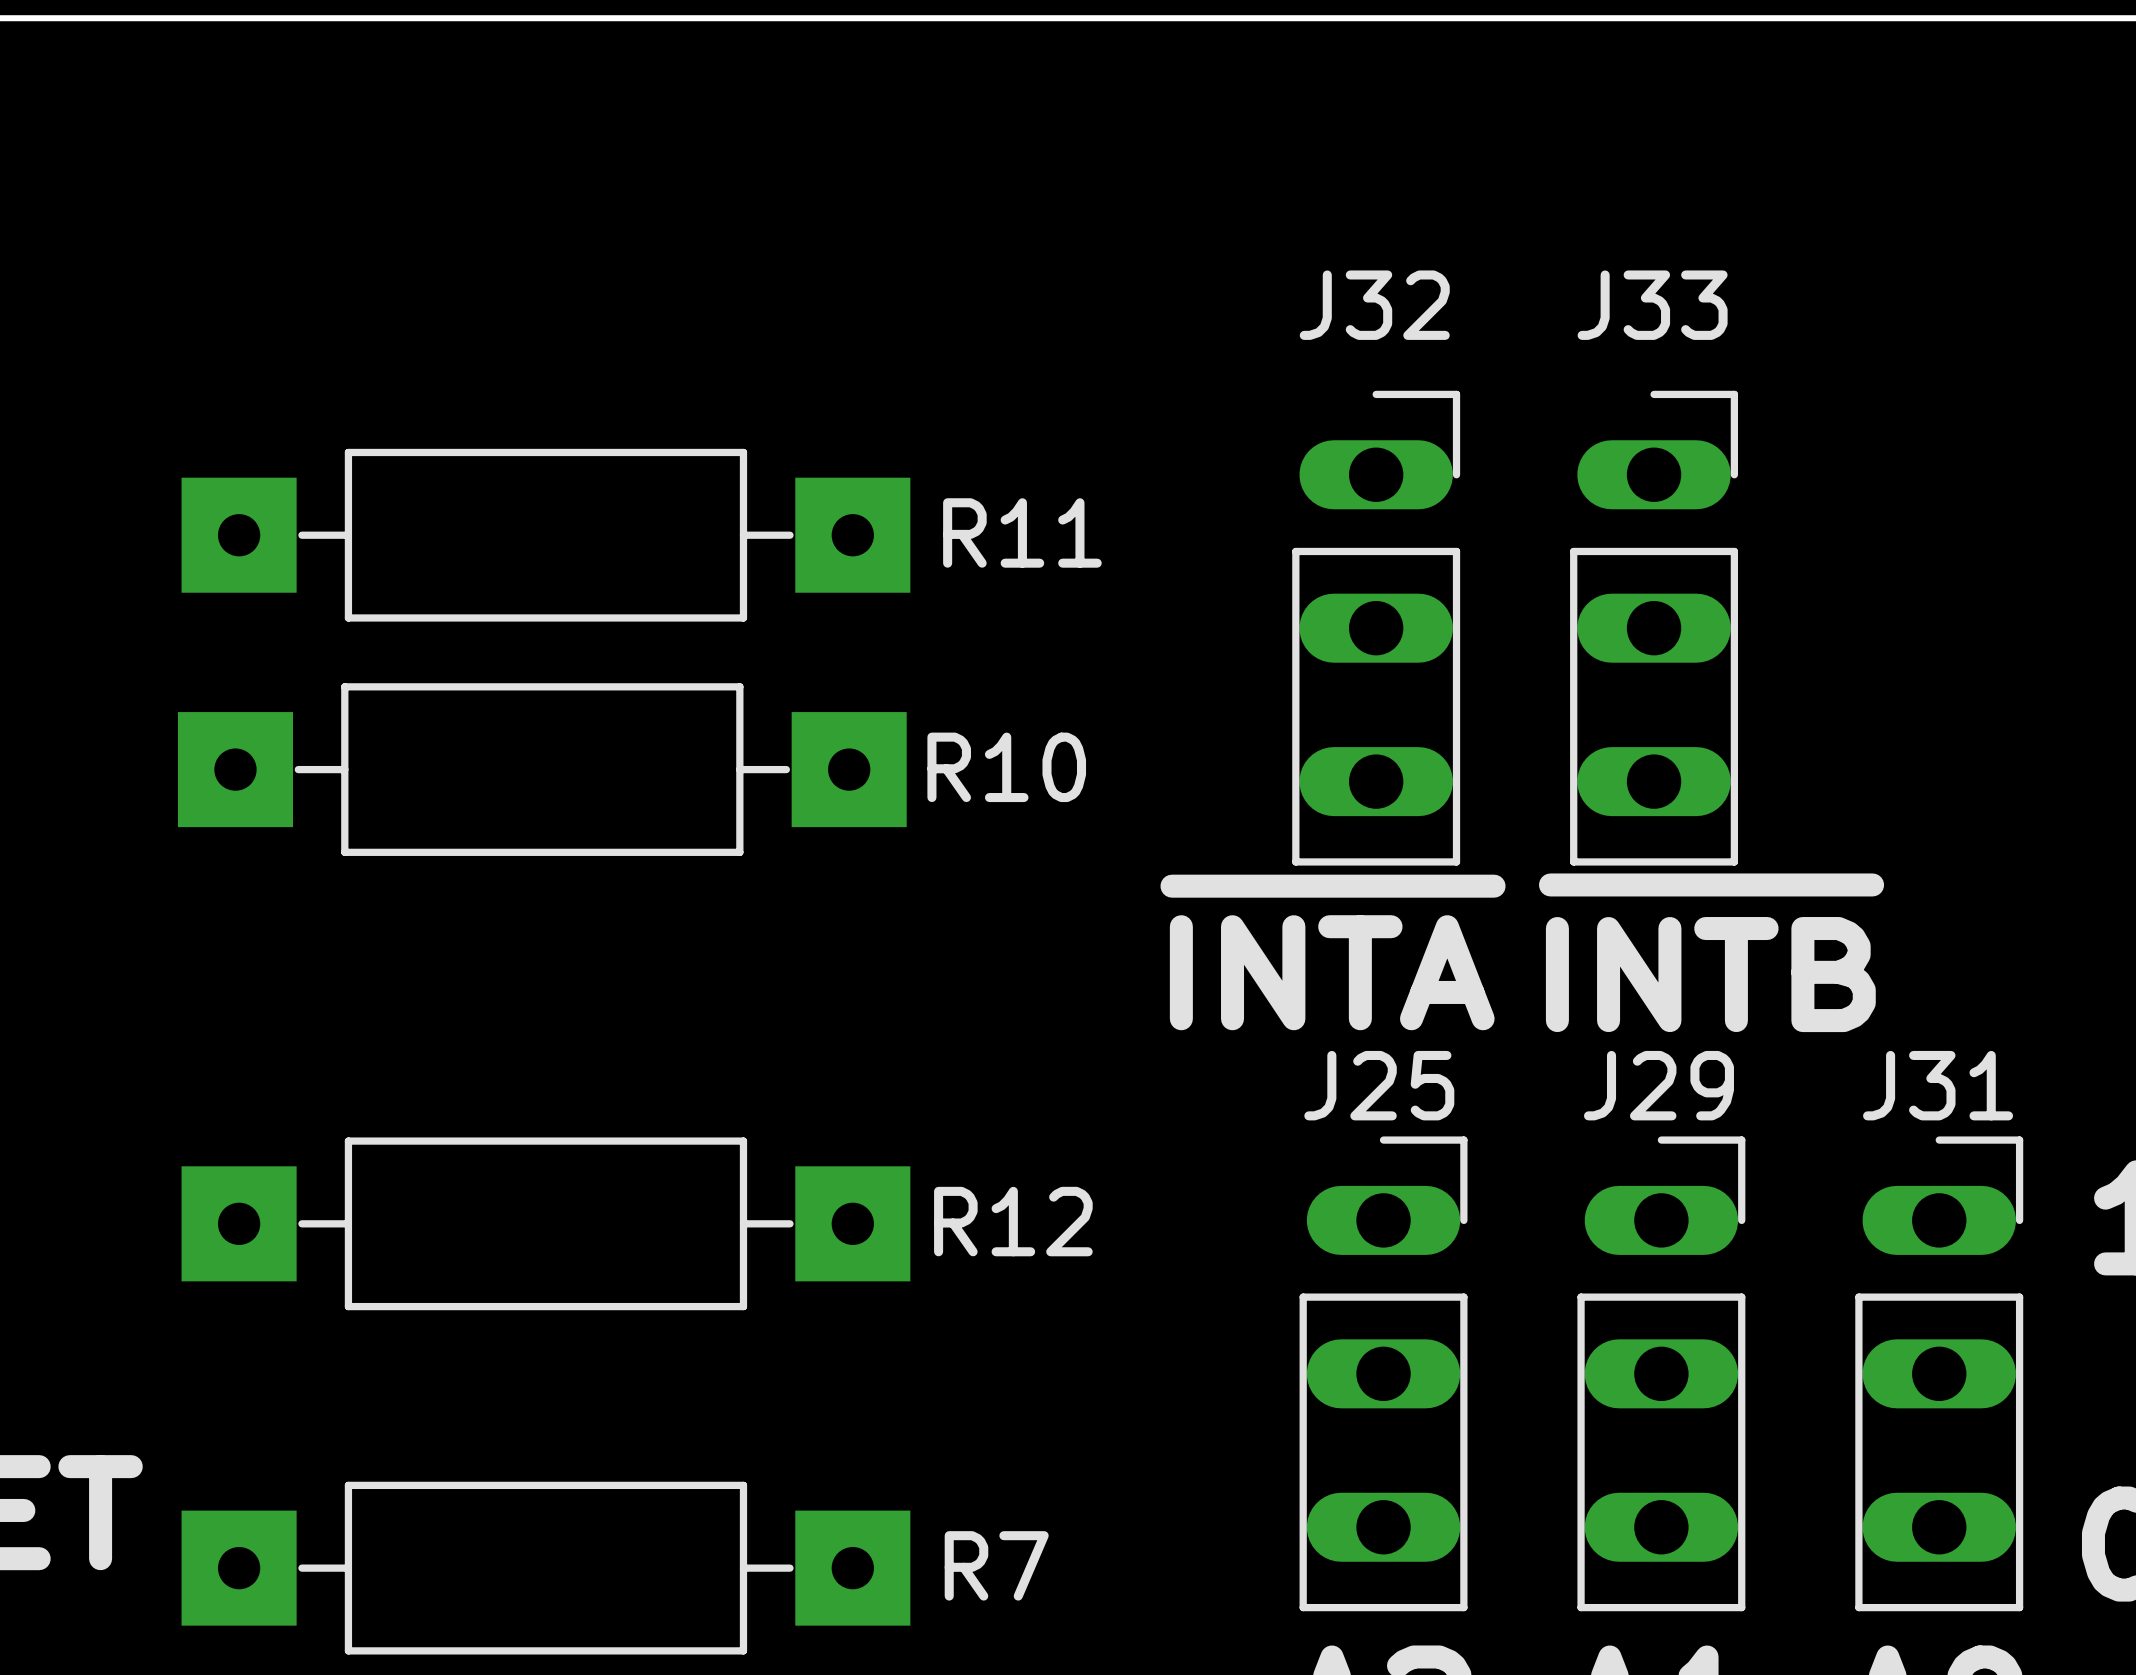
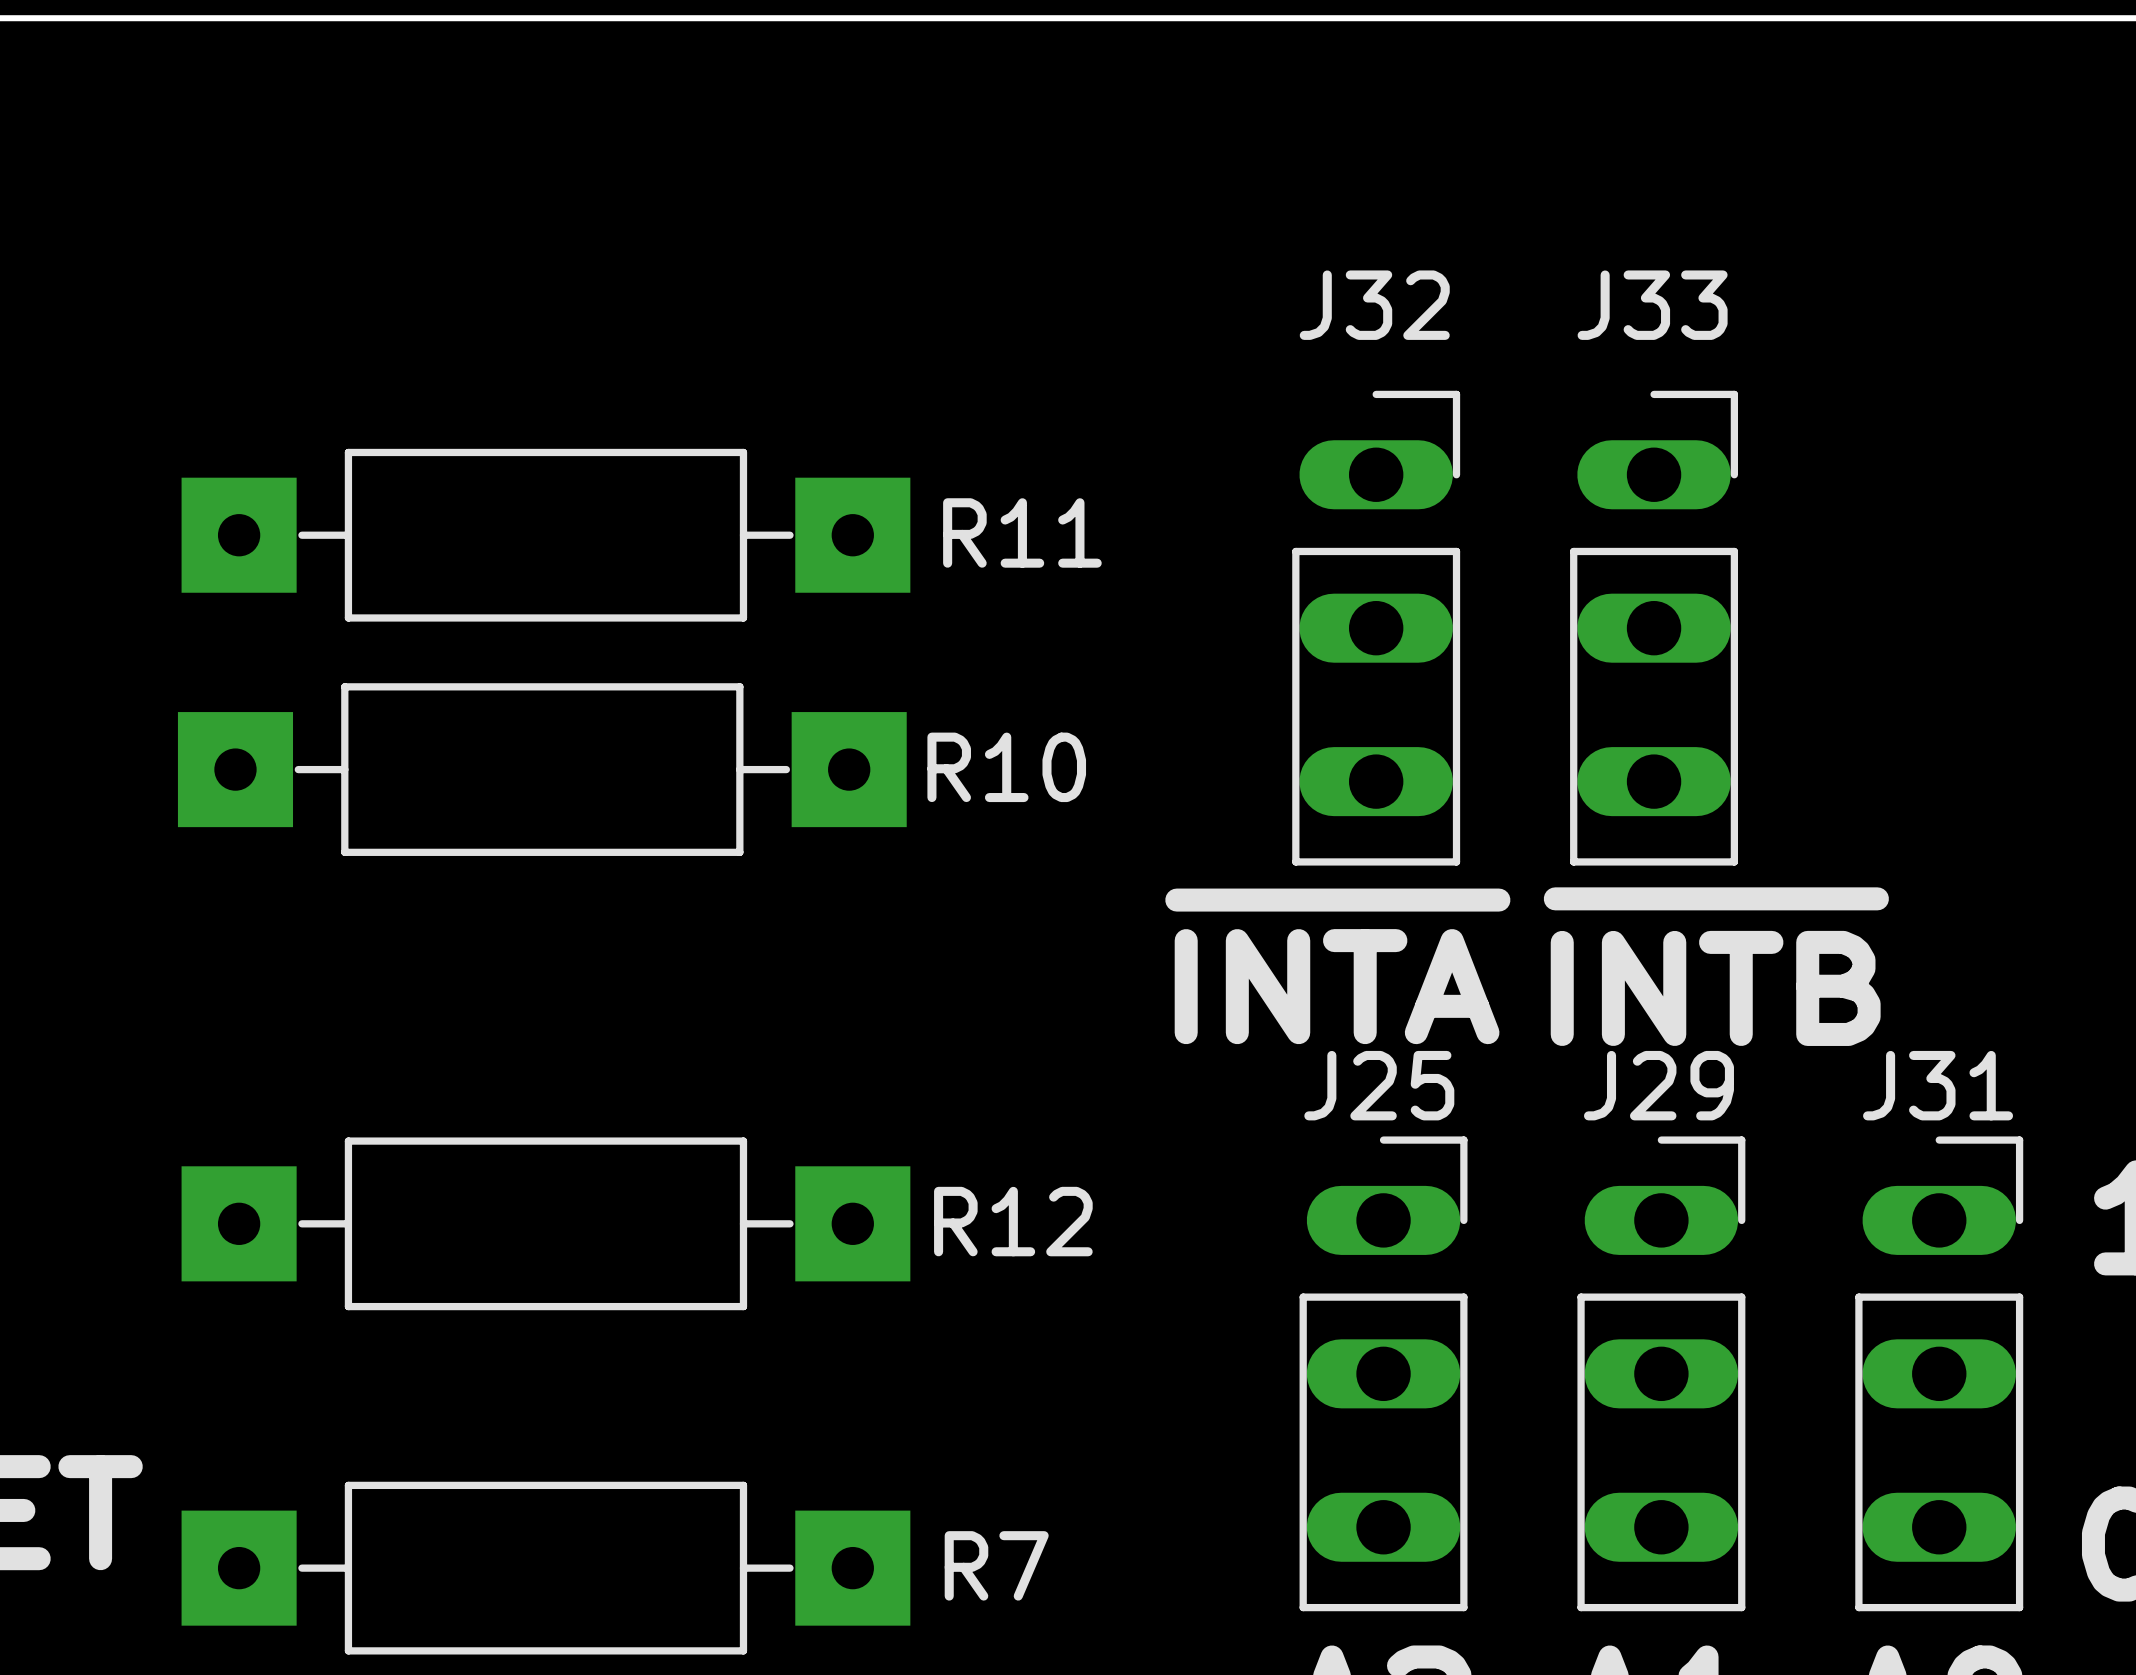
line: (1550, 884) (1872, 884) -> (1555, 898) (1877, 898)
line: (1171, 886) (1494, 886) -> (1176, 900) (1498, 900)
J32 value position: INTA (1332, 972) -> INTA (1337, 986)
J33 value position: INTB (1710, 974) -> INTB (1715, 988)

